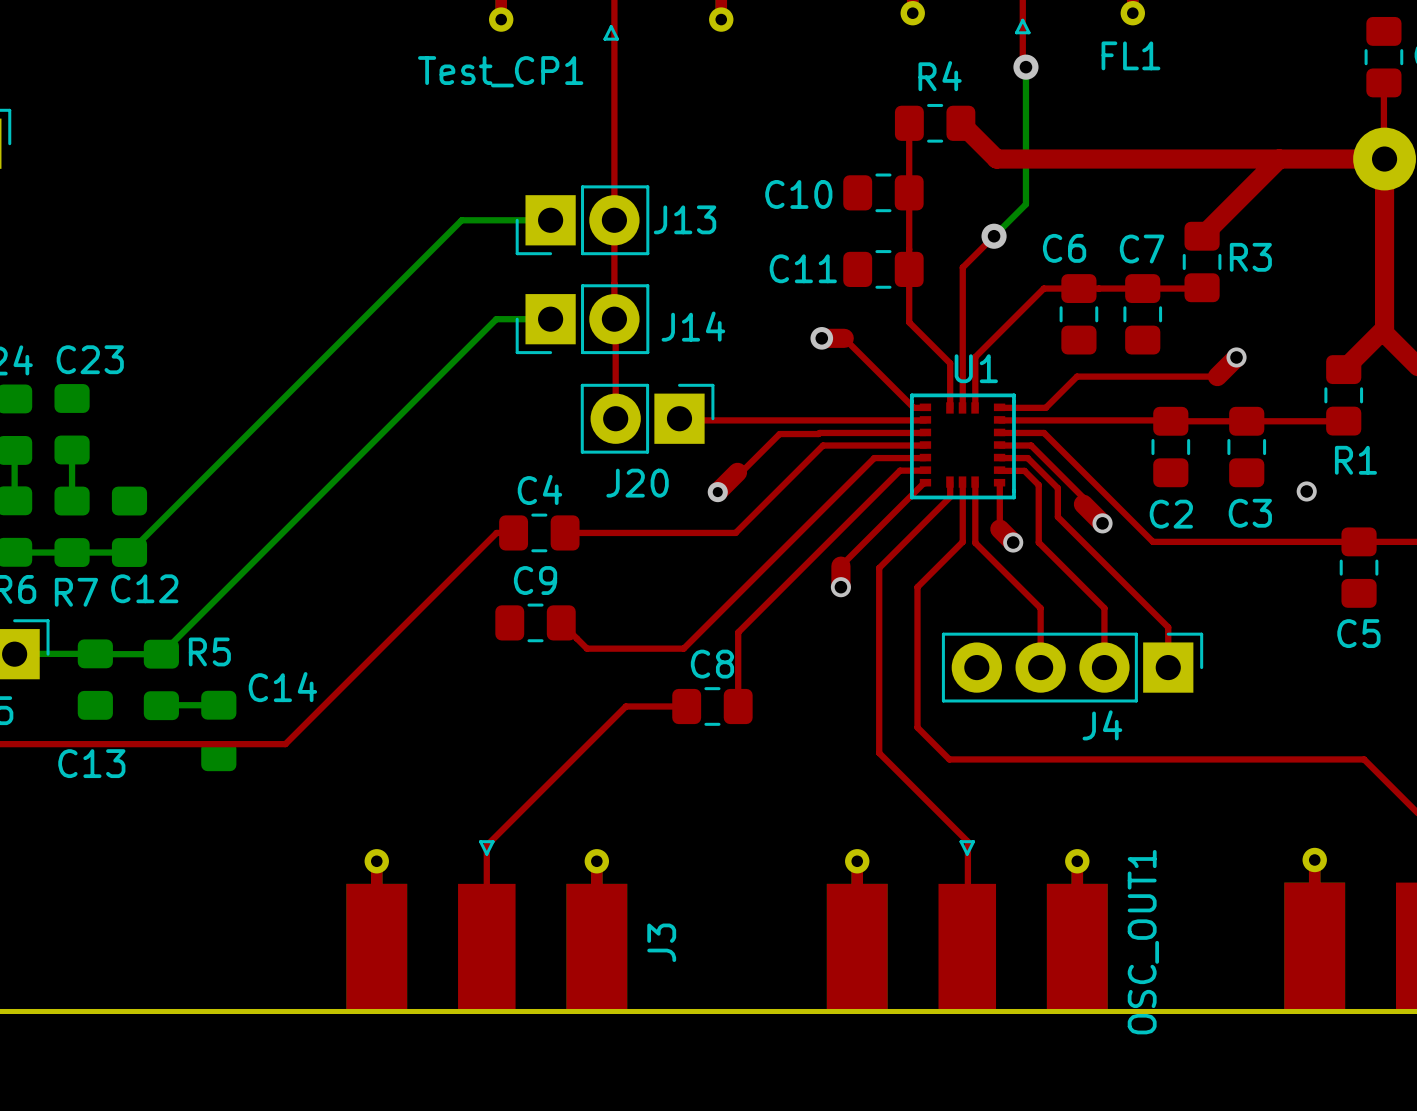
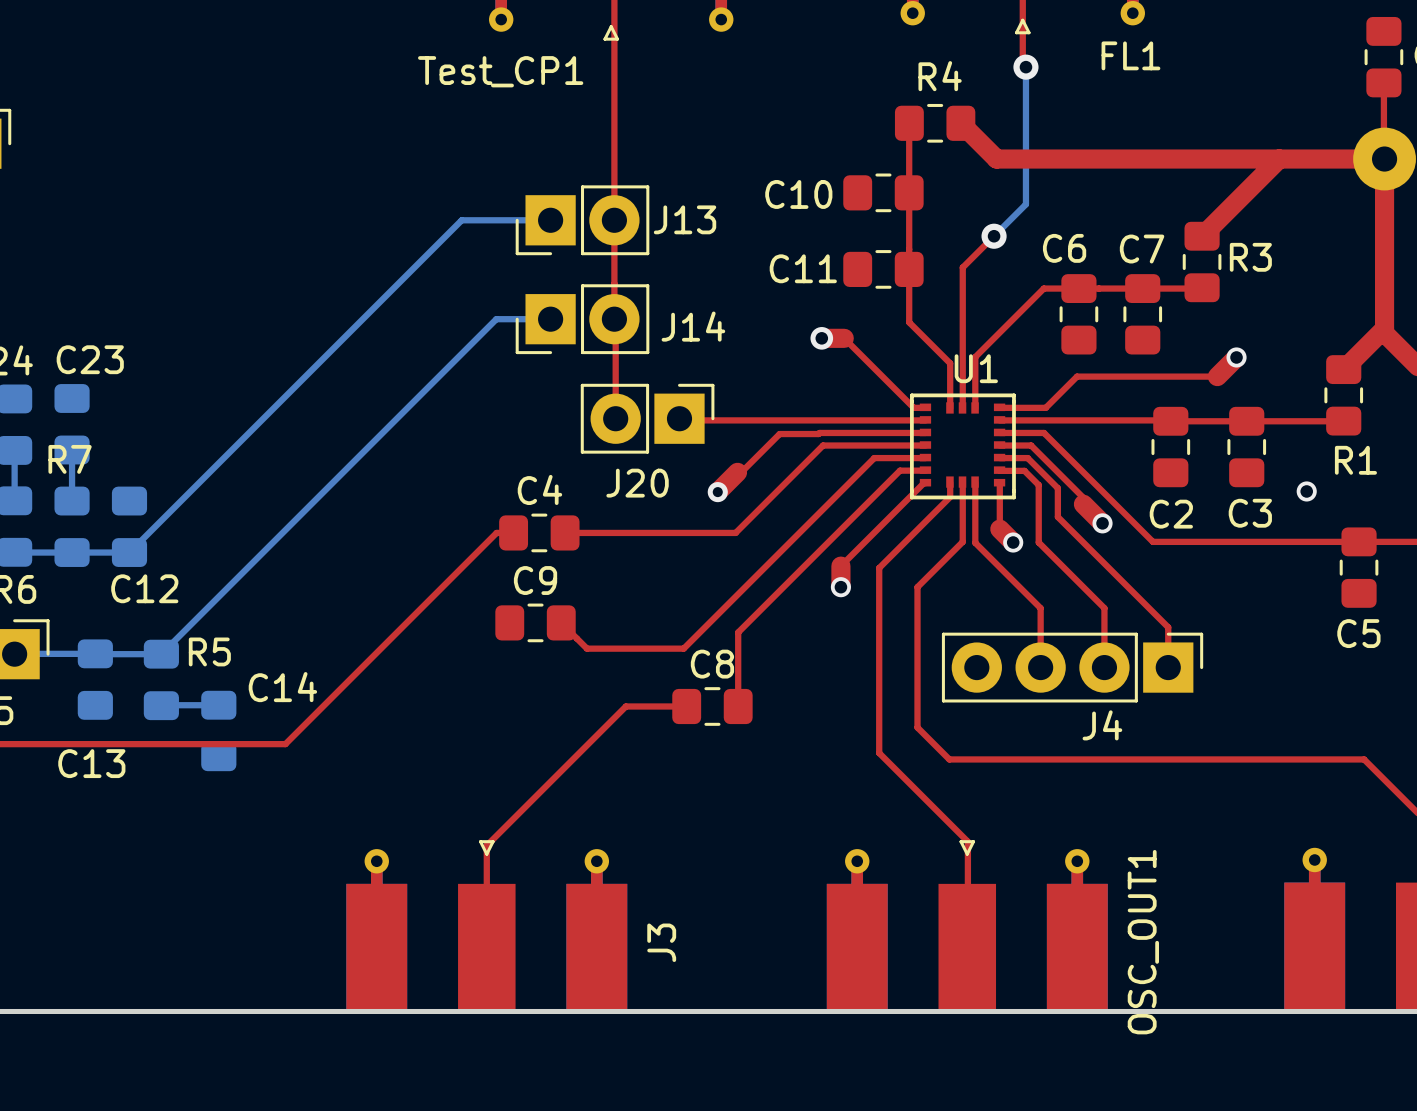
R7 name position: R7 (76, 592) -> R7 (70, 459)

